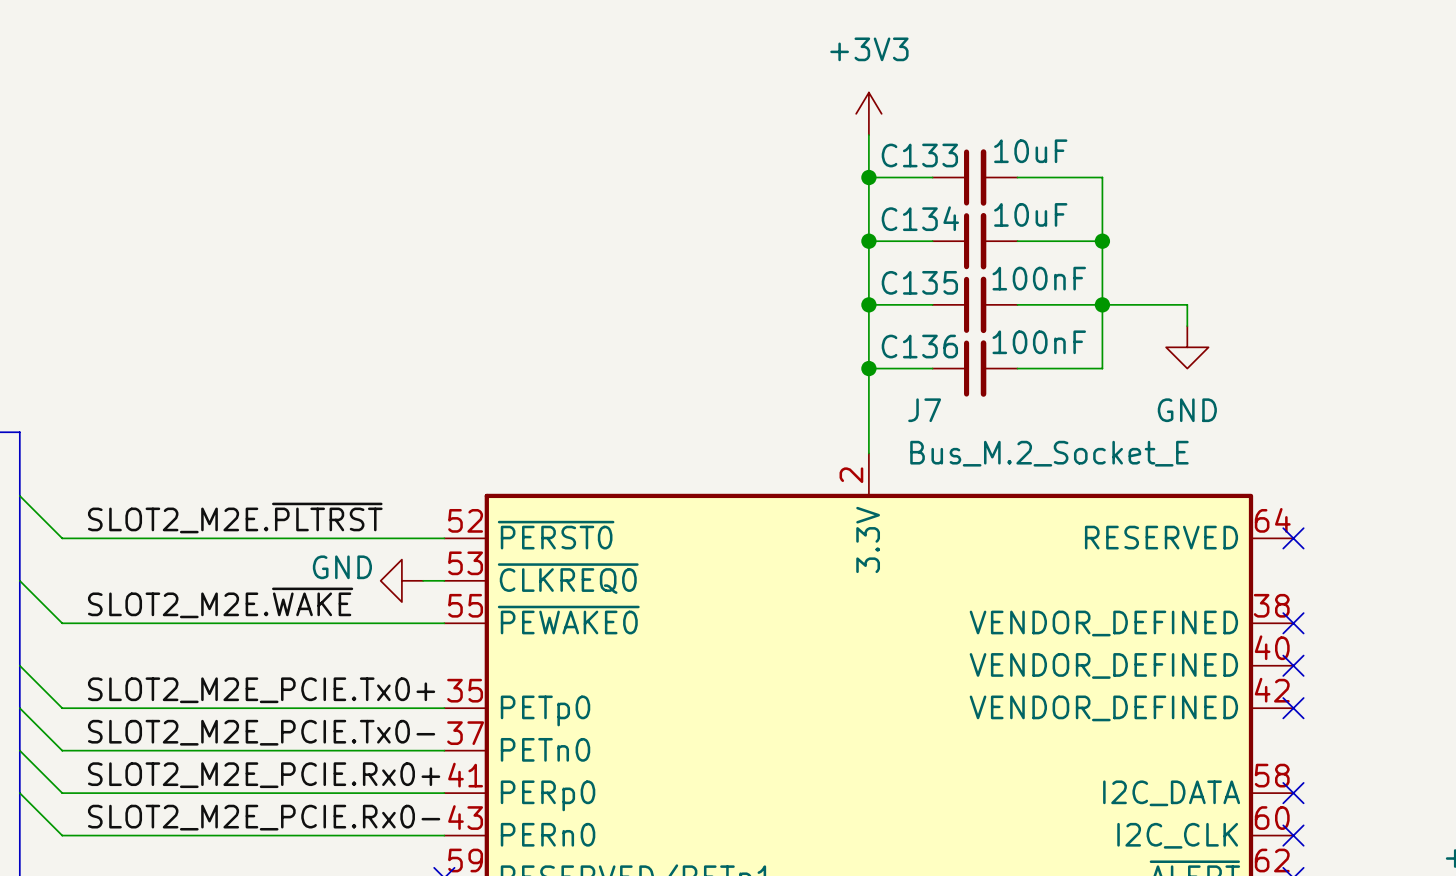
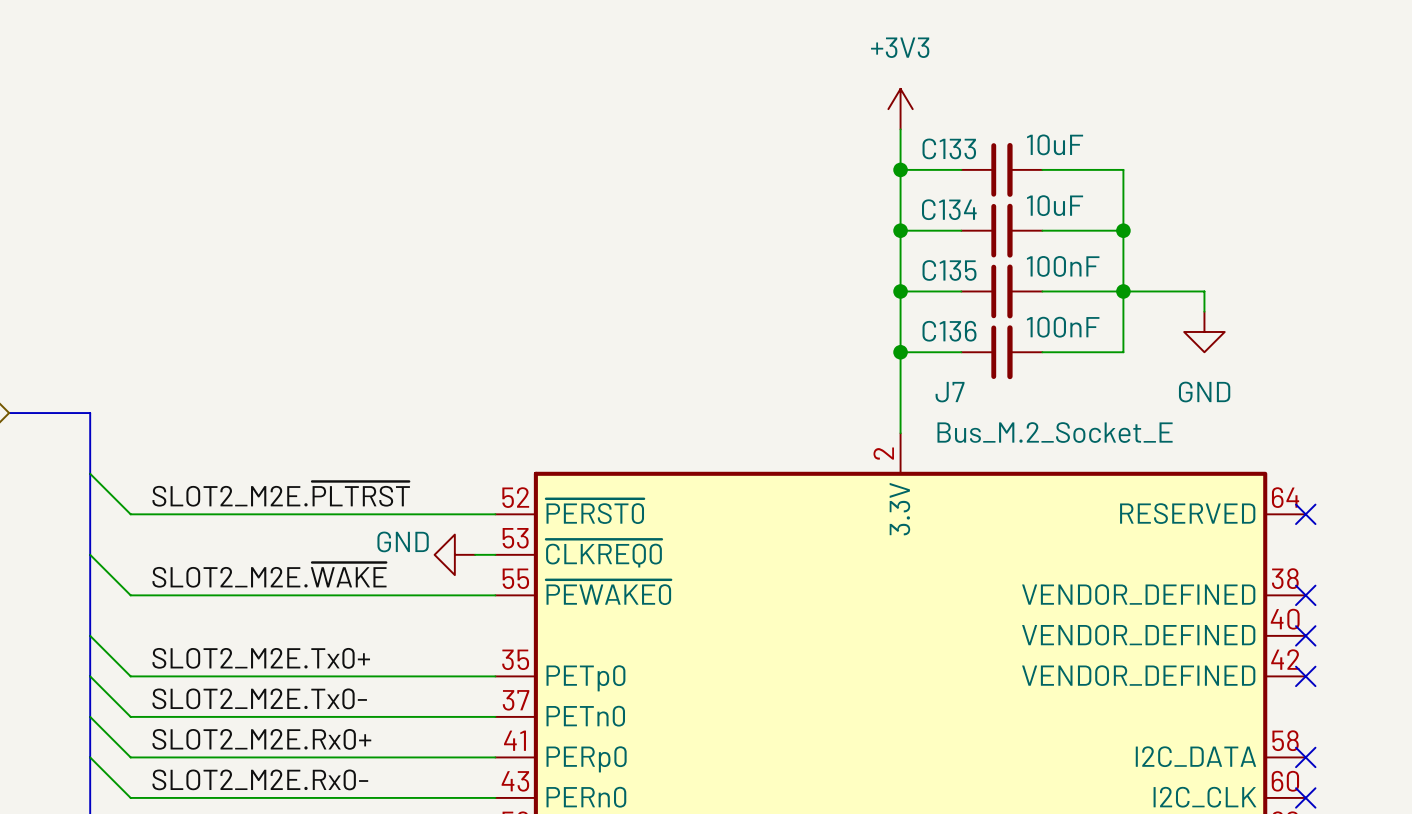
label: SLOT2_M2E_PCIE.Tx0+ (261, 690) -> SLOT2_M2E.Tx0+ (261, 658)
label: SLOT2_M2E_PCIE.Tx0- (261, 732) -> SLOT2_M2E.Tx0- (259, 698)
label: SLOT2_M2E_PCIE.Rx0+ (264, 775) -> SLOT2_M2E.Rx0+ (261, 739)
label: SLOT2_M2E_PCIE.Rx0- (264, 817) -> SLOT2_M2E.Rx0- (260, 779)

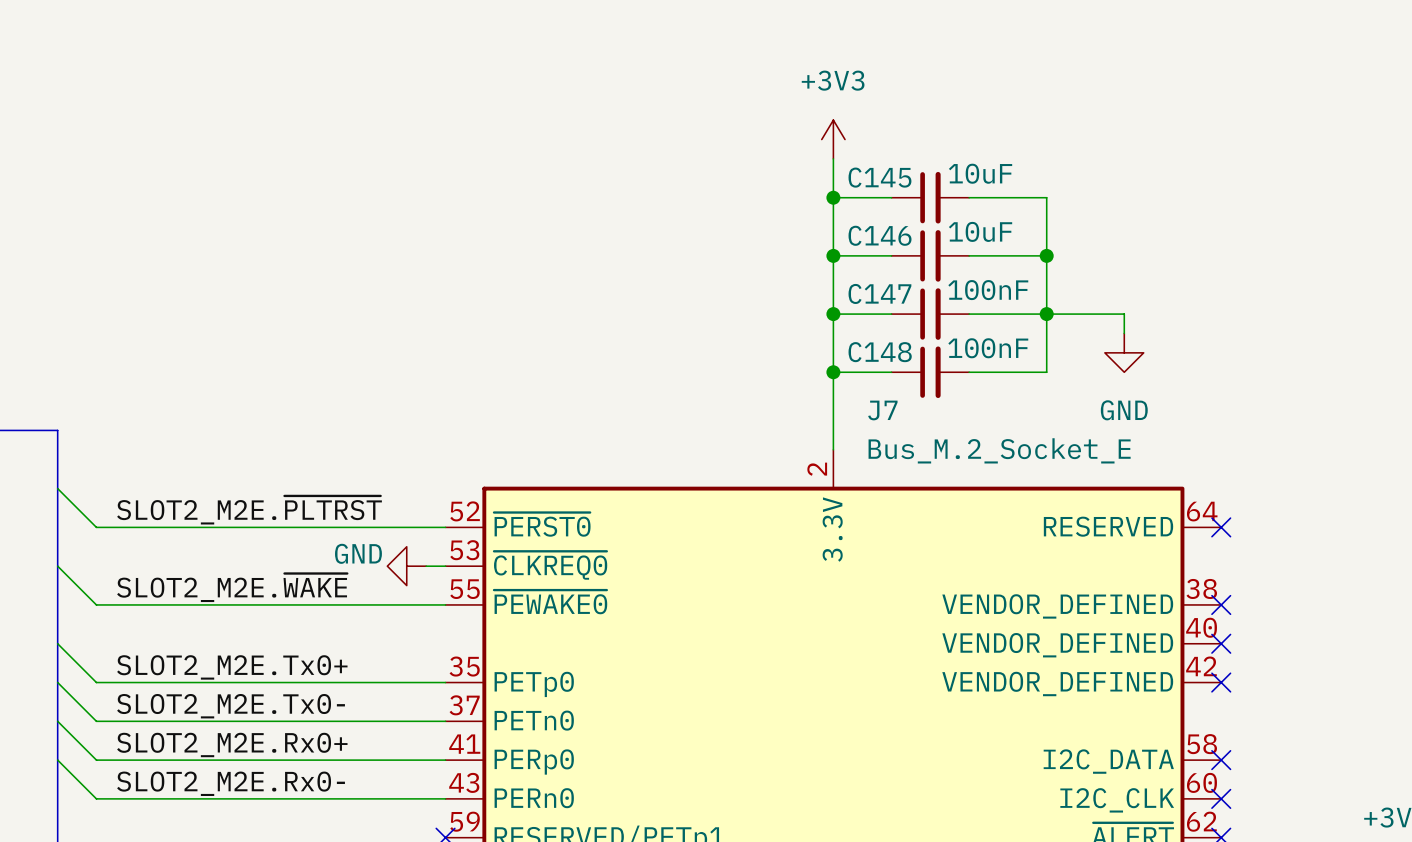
C133 name: C133 (949, 148) -> C145 (879, 177)
C134 name: C134 (949, 209) -> C146 (880, 235)
C135 name: C135 (949, 270) -> C147 (879, 293)
C136 name: C136 (949, 331) -> C148 (880, 352)

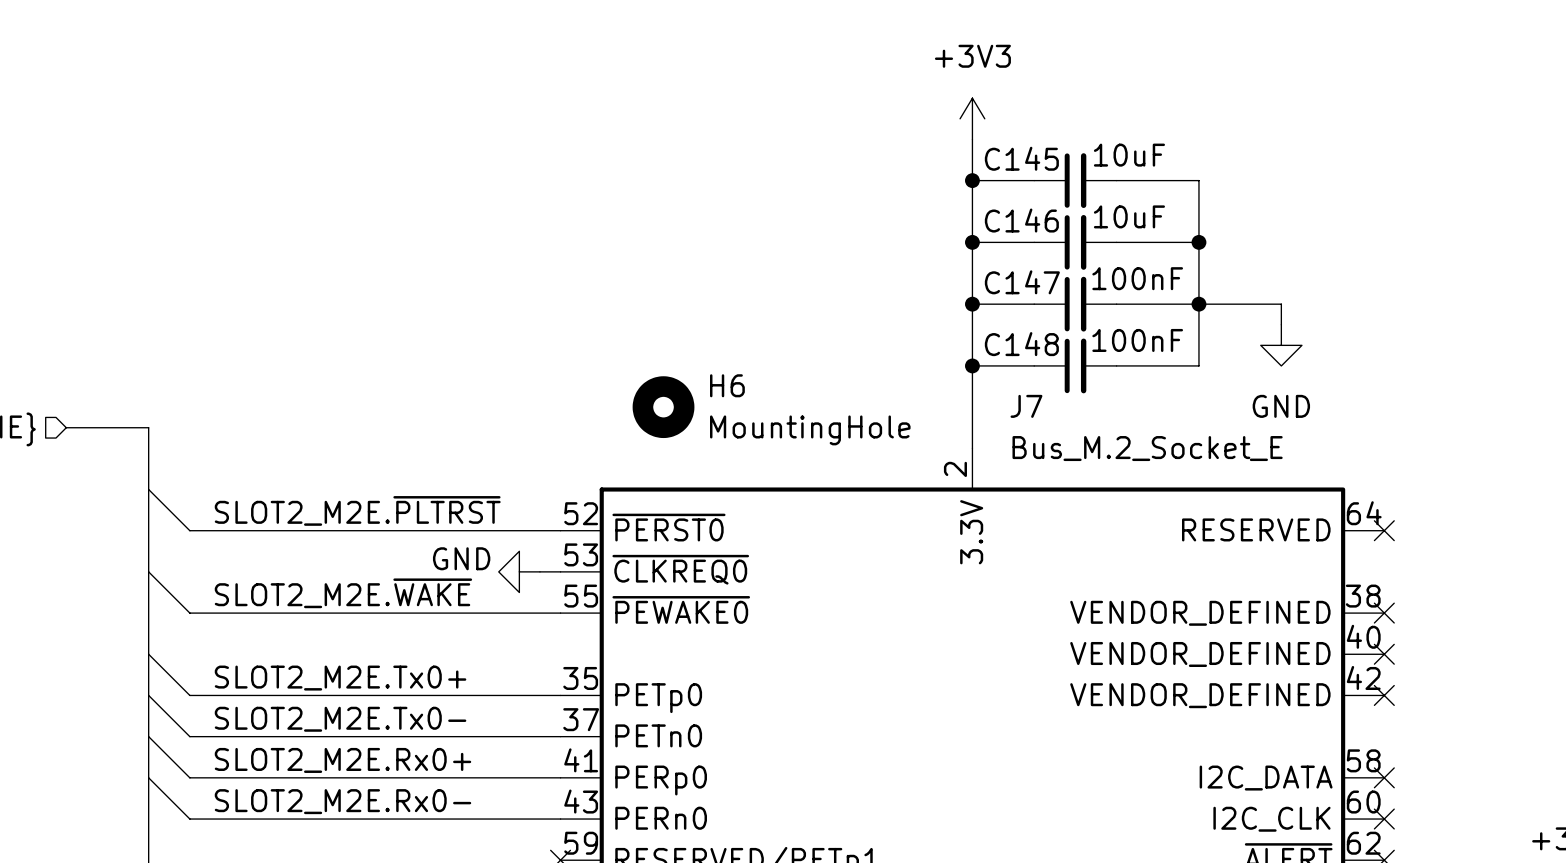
H6: none -> MountingHole (663, 407)

